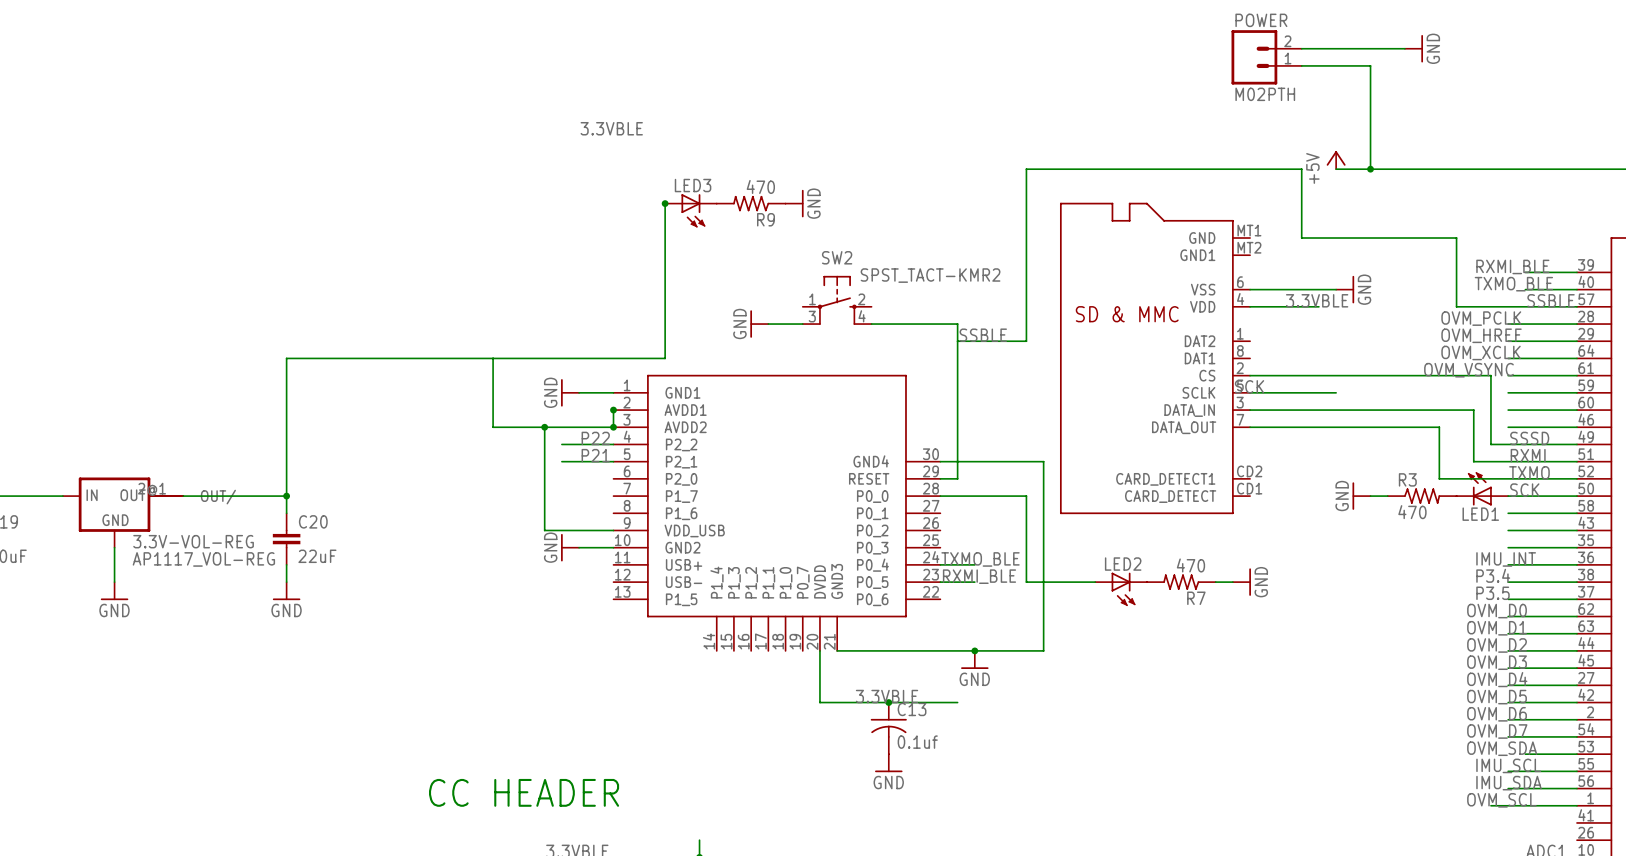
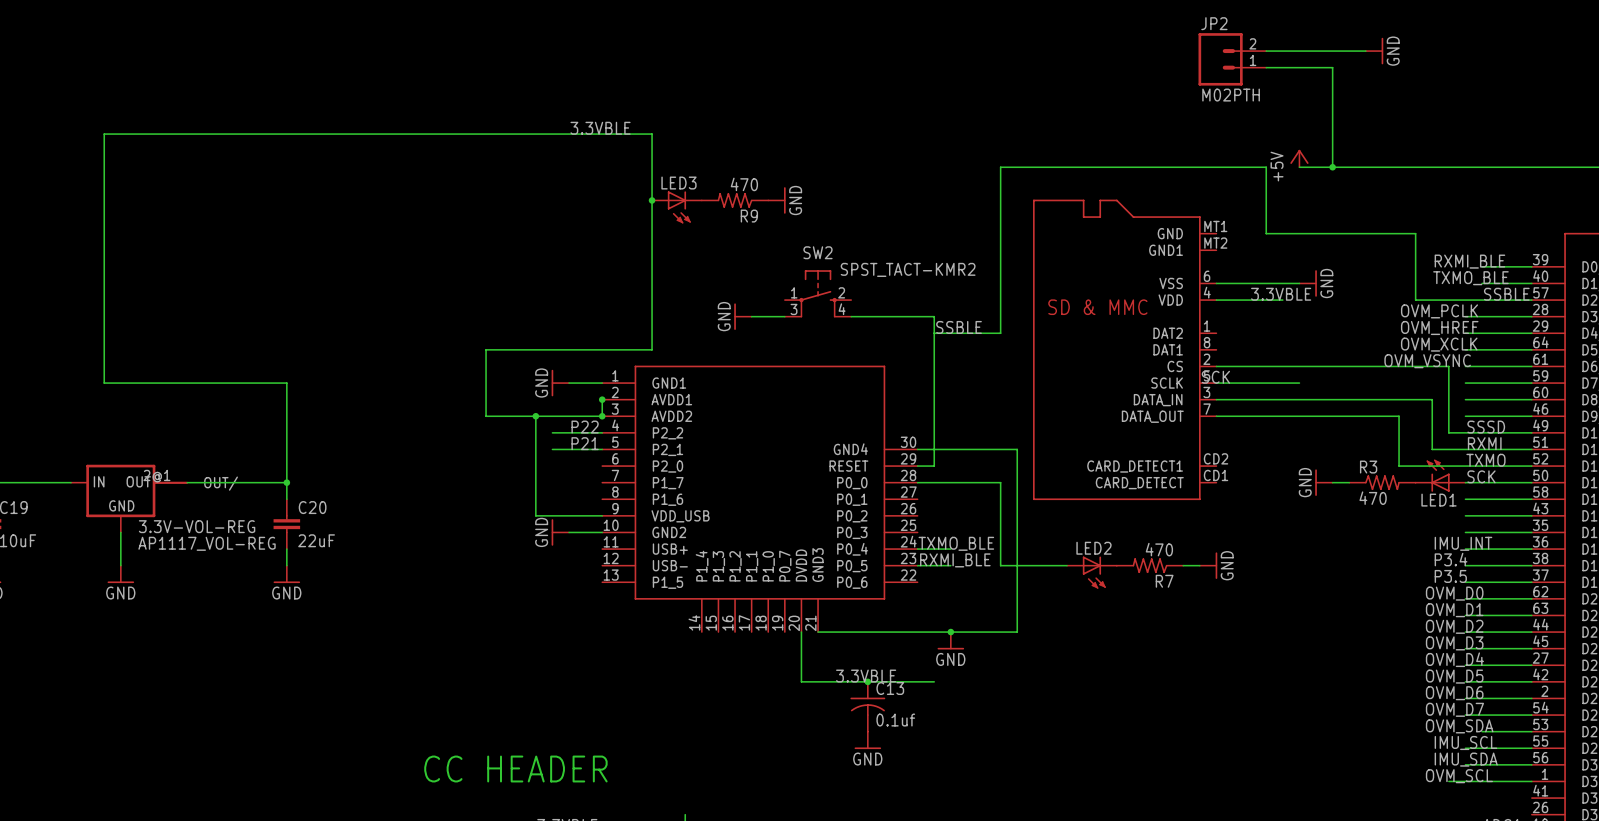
POWER name: POWER (1261, 20) -> JP2 (1214, 23)
wire: (493, 358) (286, 358) (286, 392) -> (652, 200) (652, 134) (104, 134) (104, 383) (286, 383)

